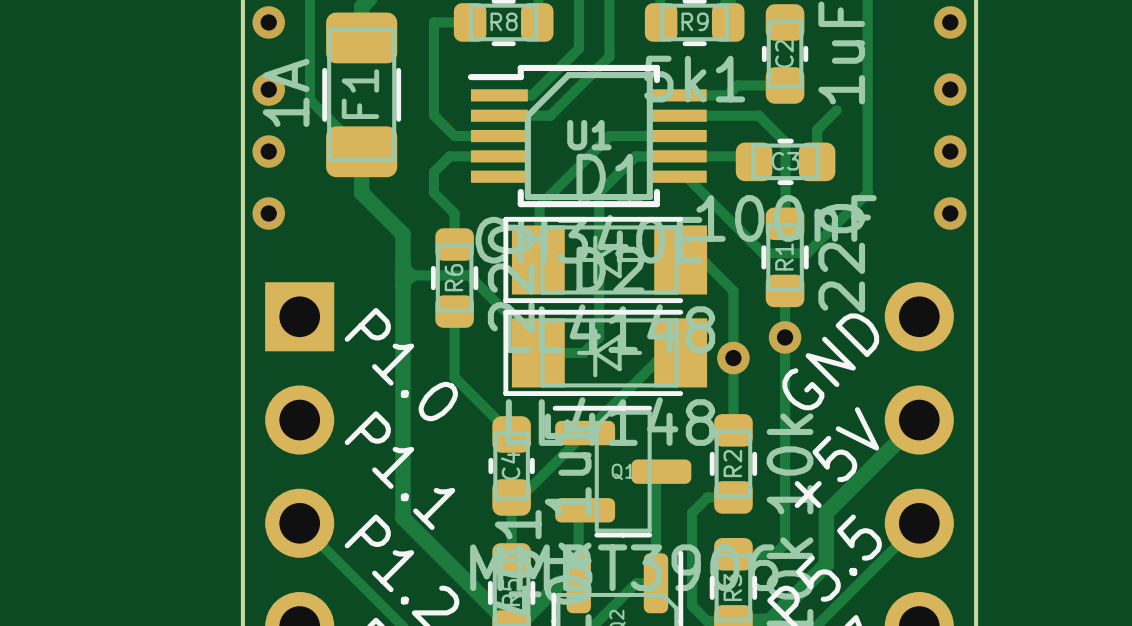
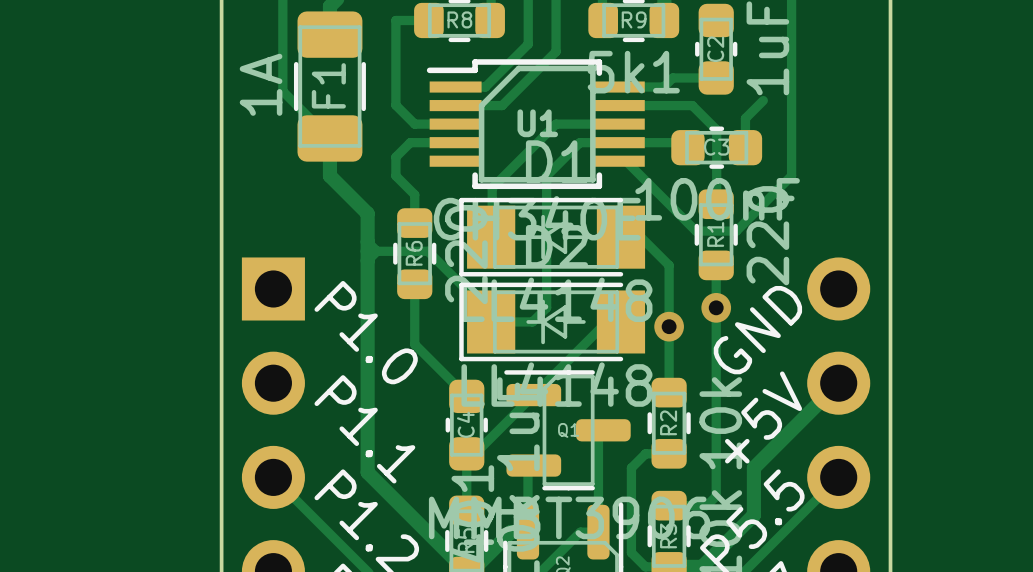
via: (268, 22) -> none
via: (950, 22) -> none
via: (268, 89) -> none
via: (950, 89) -> none
via: (268, 151) -> none
via: (950, 151) -> none
via: (268, 213) -> none
via: (950, 213) -> none

